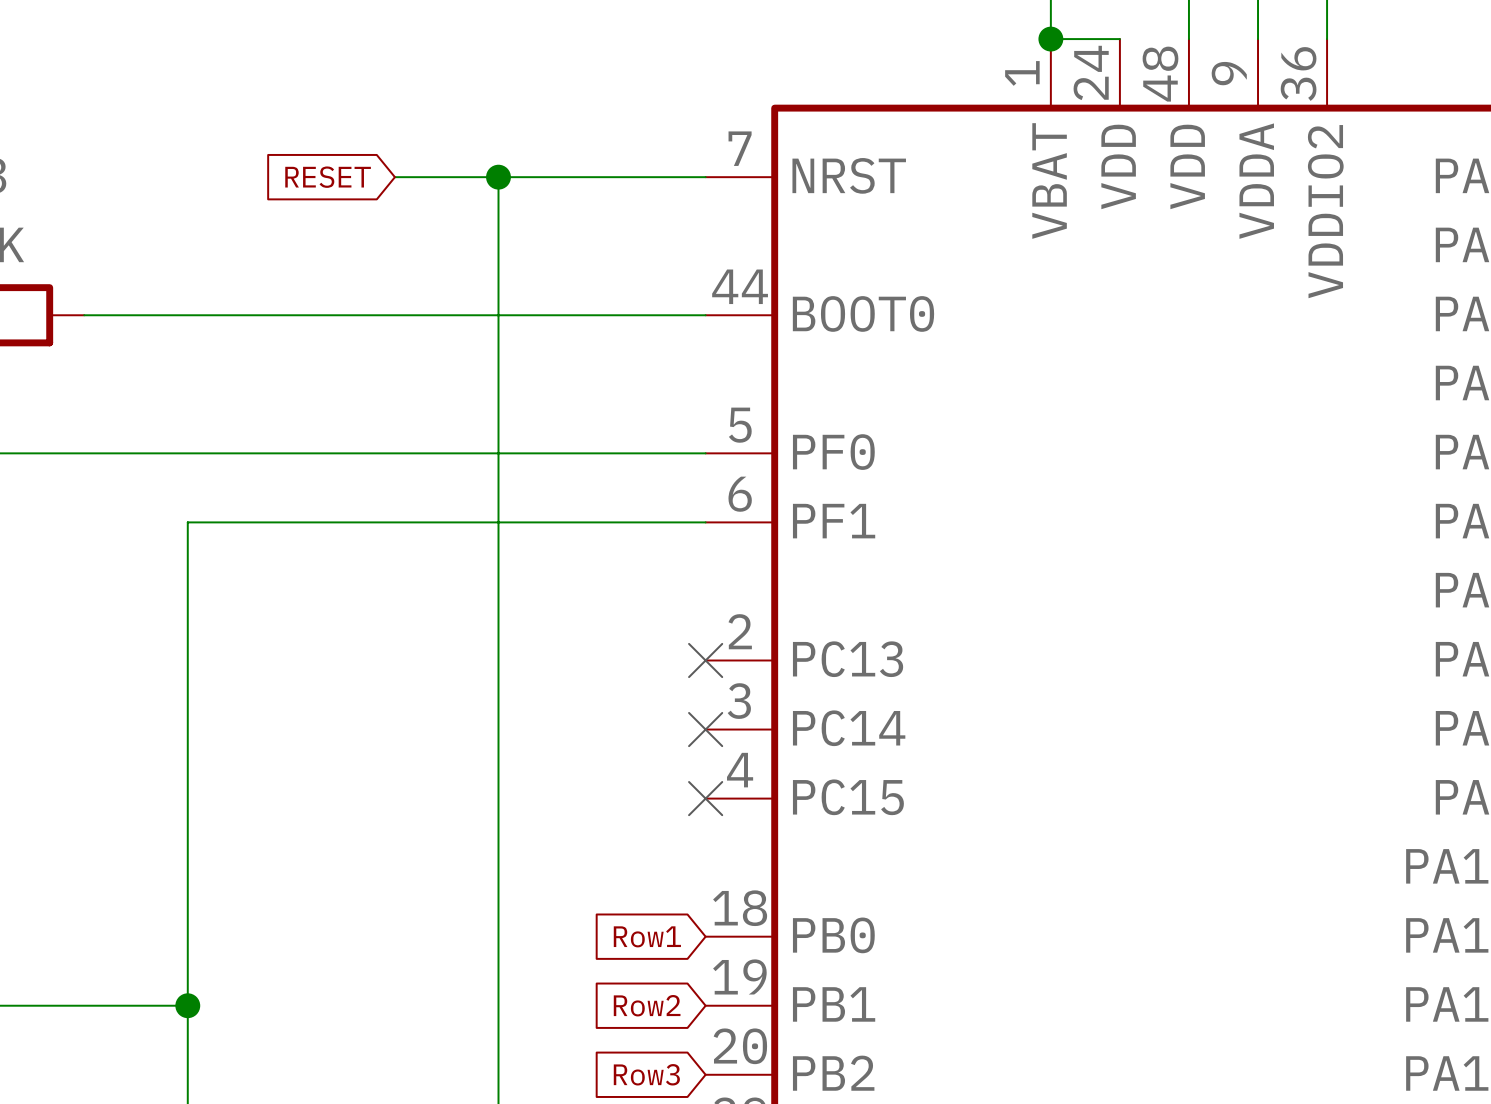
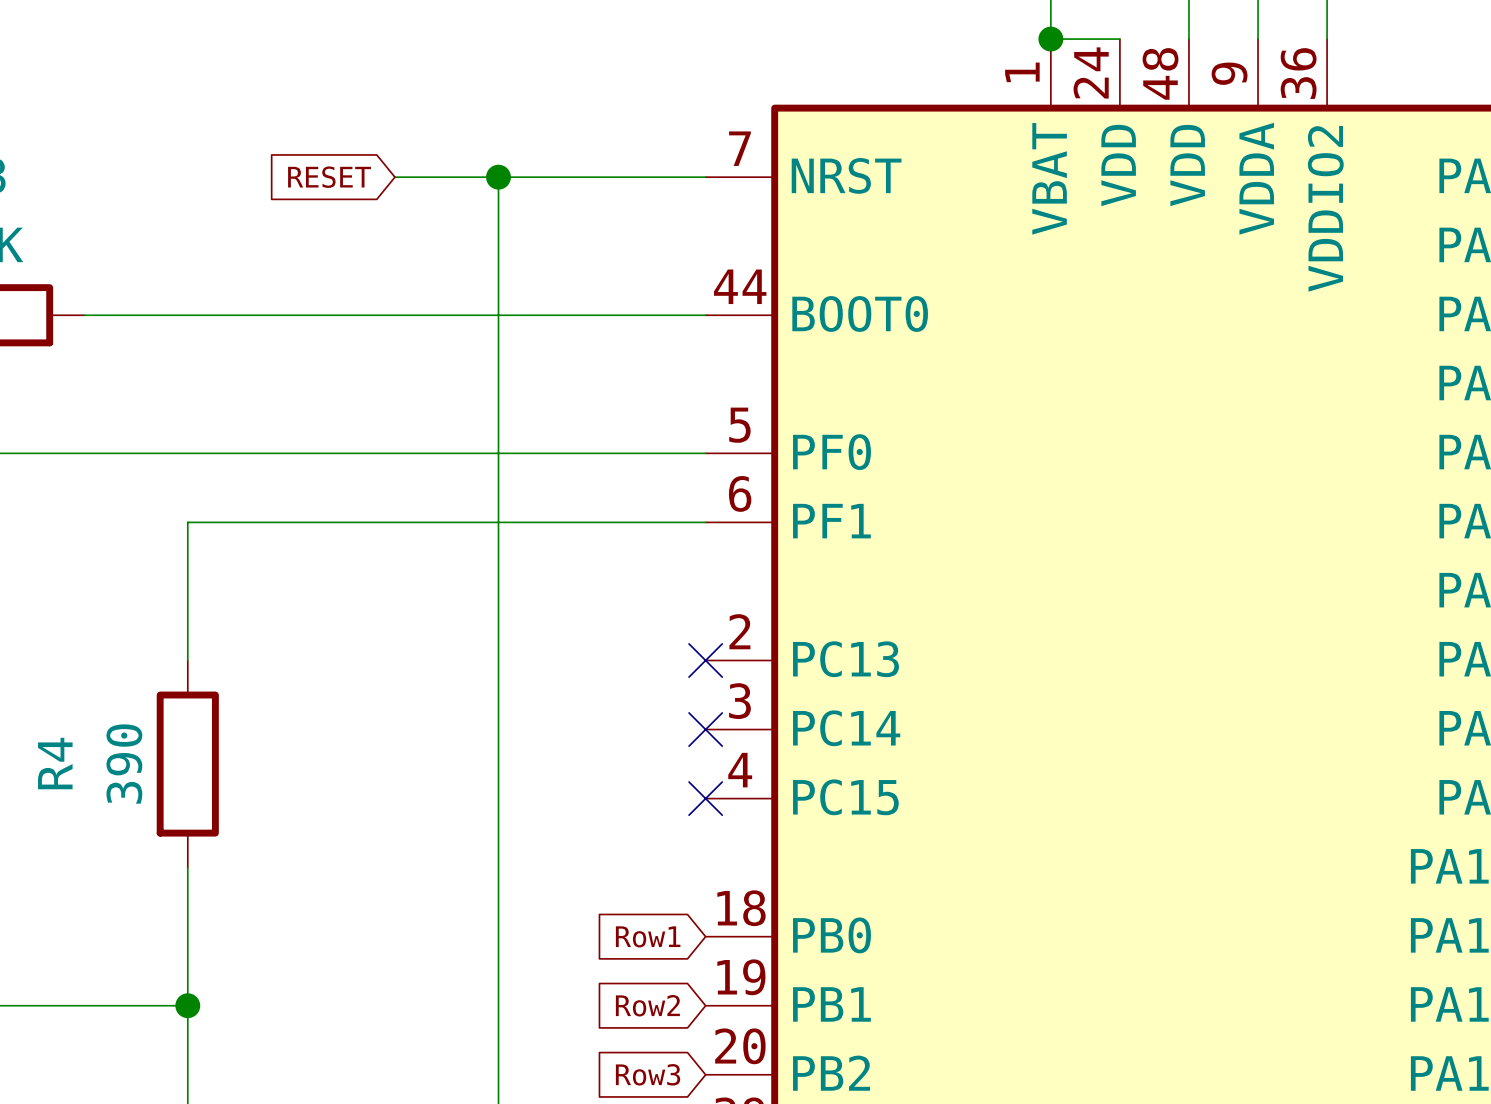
wire: (187, 660) (187, 867) -> none
R4: none -> 390 (187, 764)

